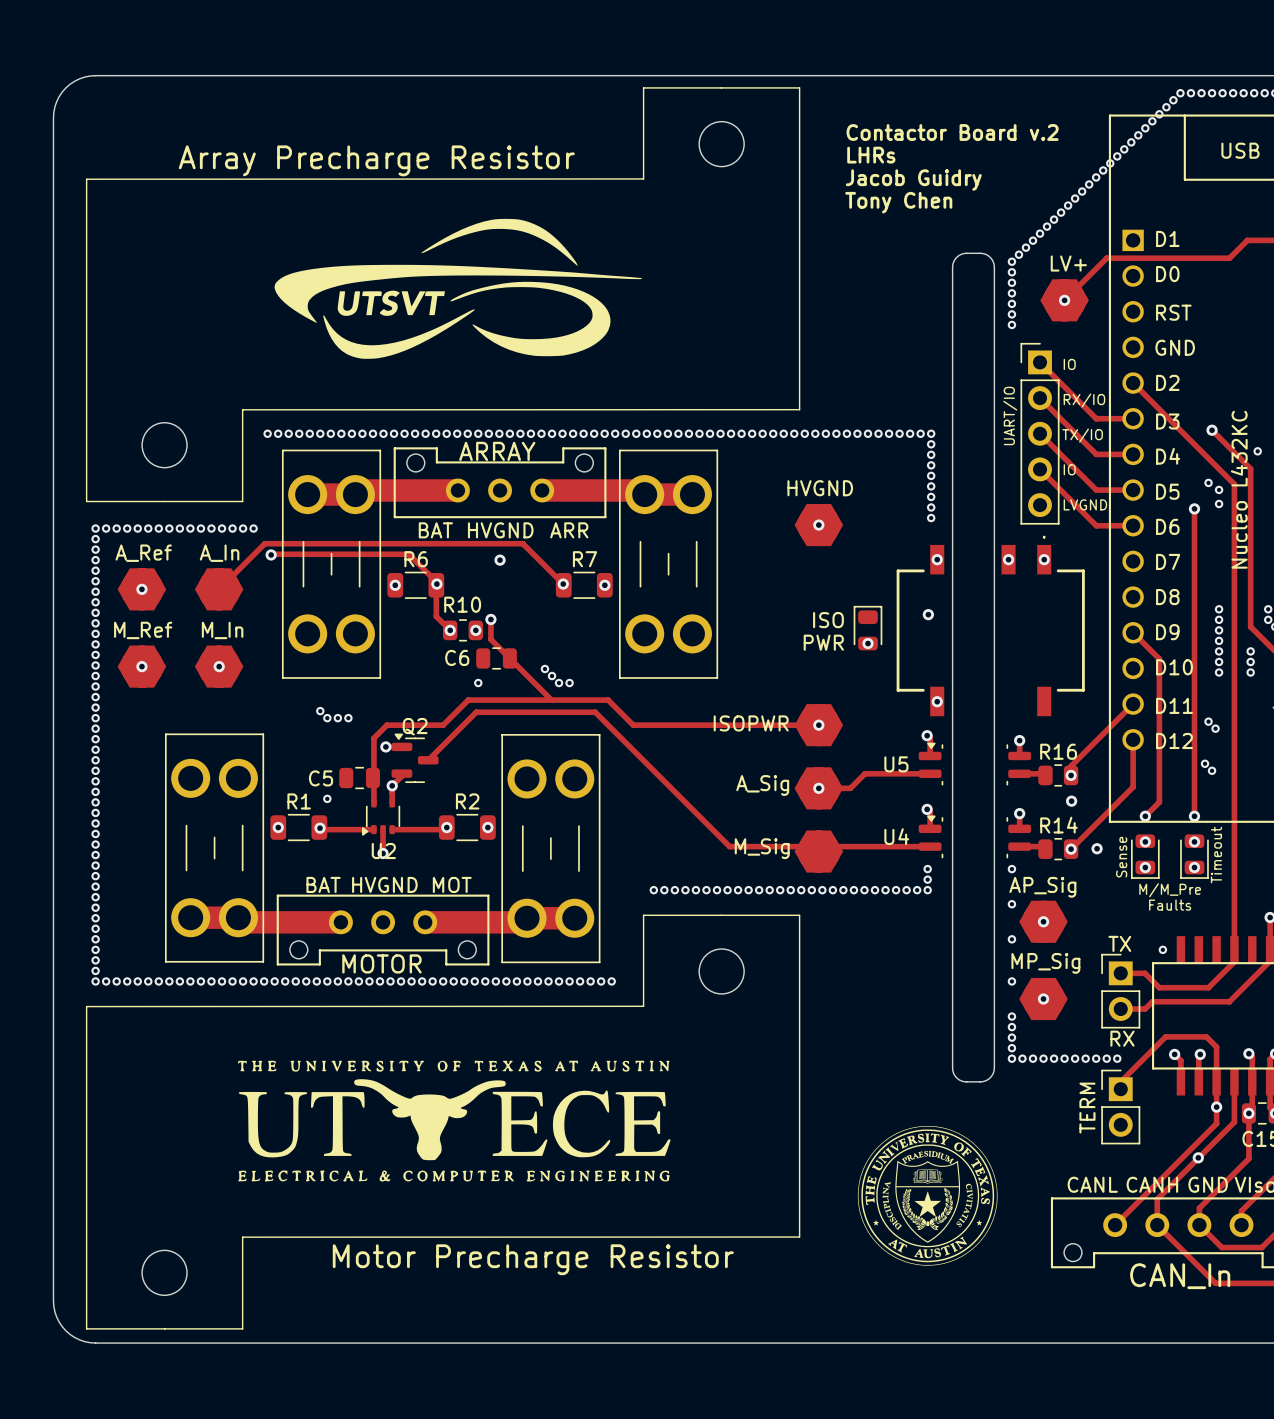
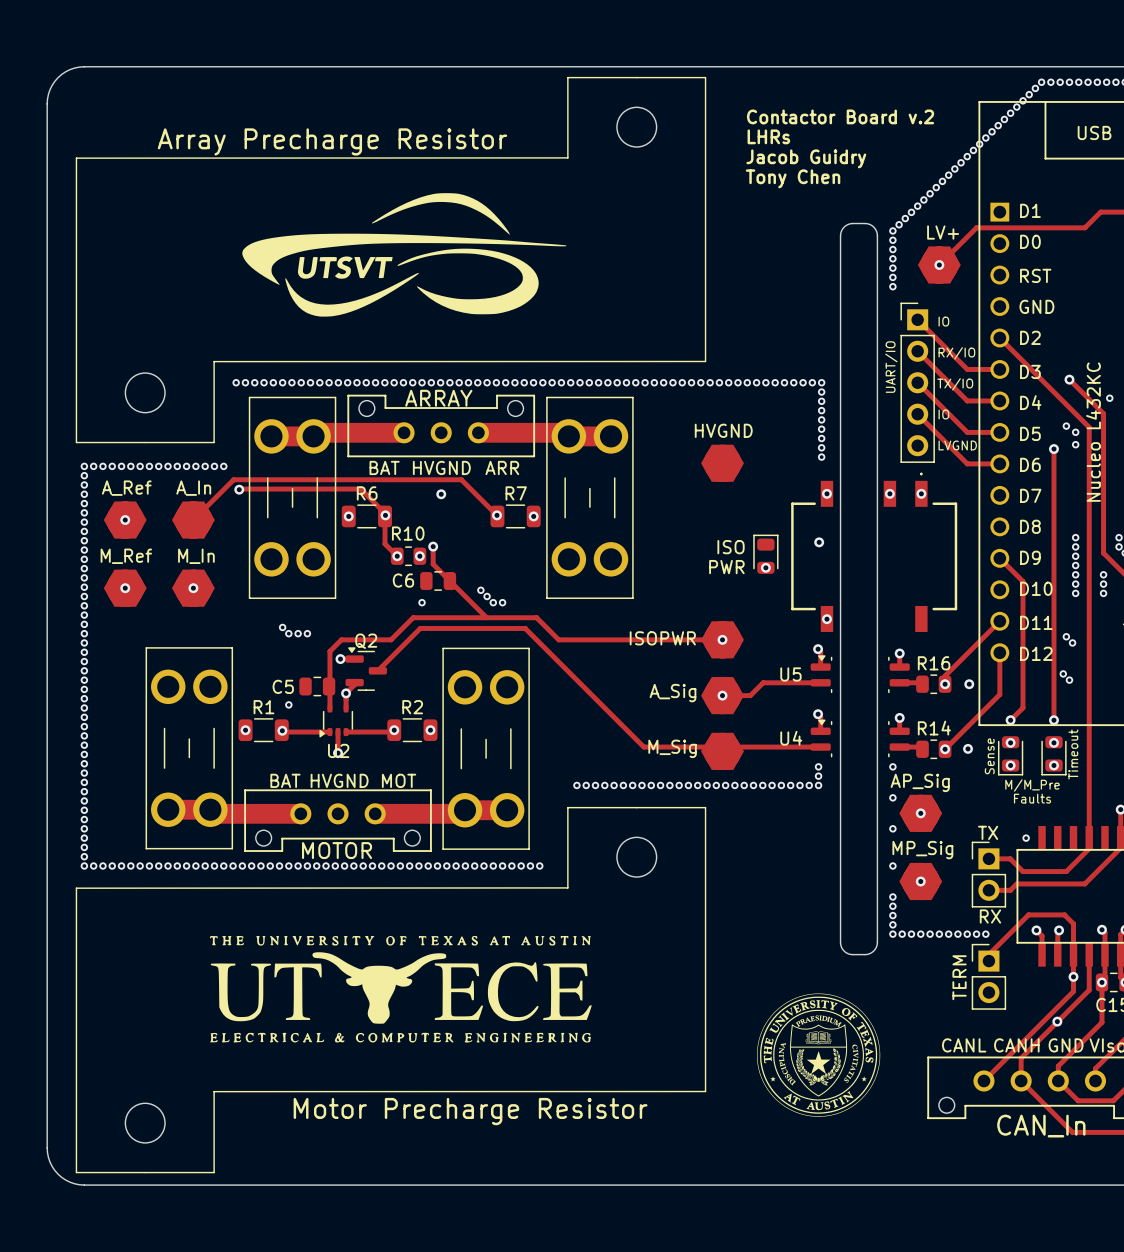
via: (818, 525) -> none
via position: (1071, 801) -> (969, 684)

